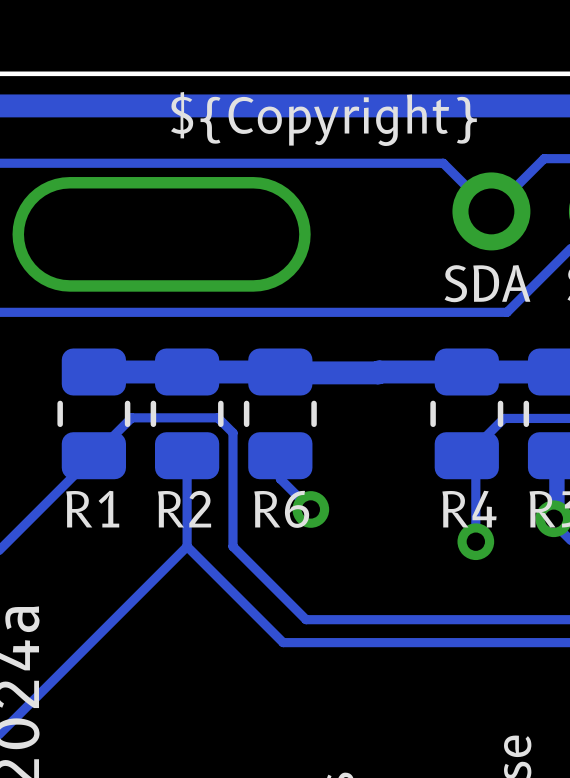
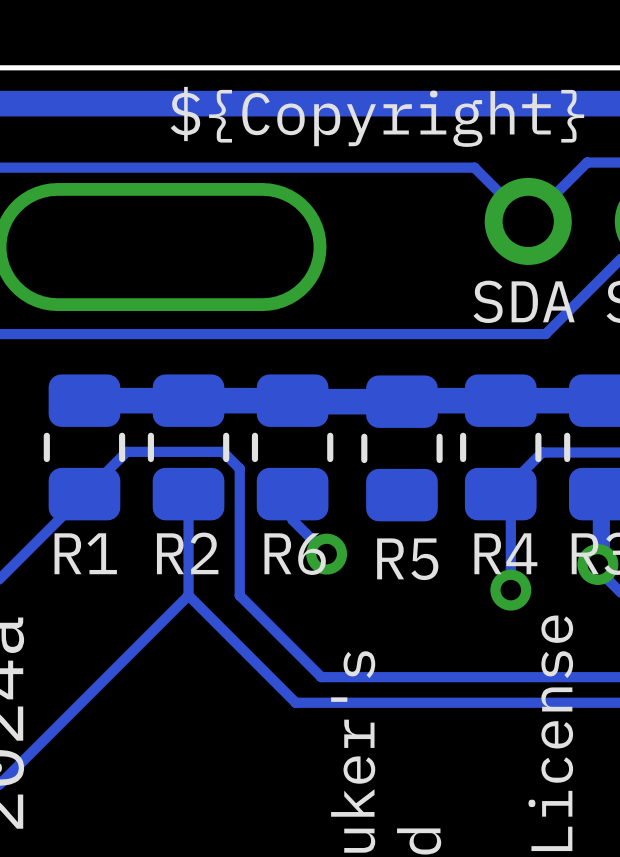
R5: none -> (401, 448)

